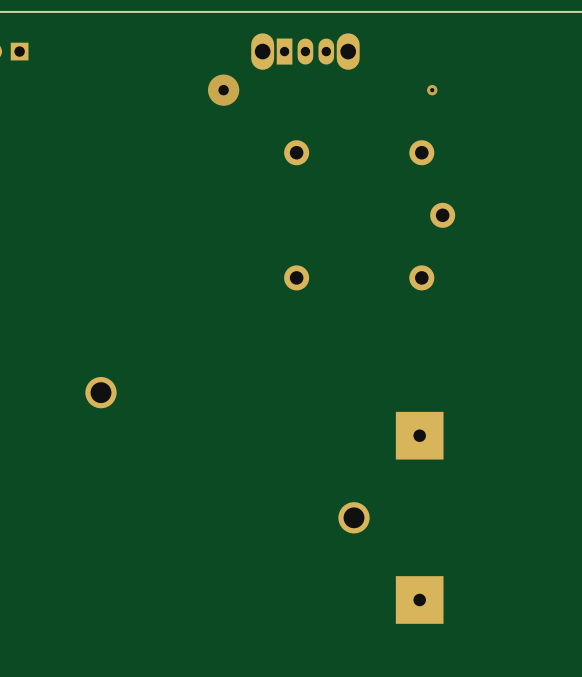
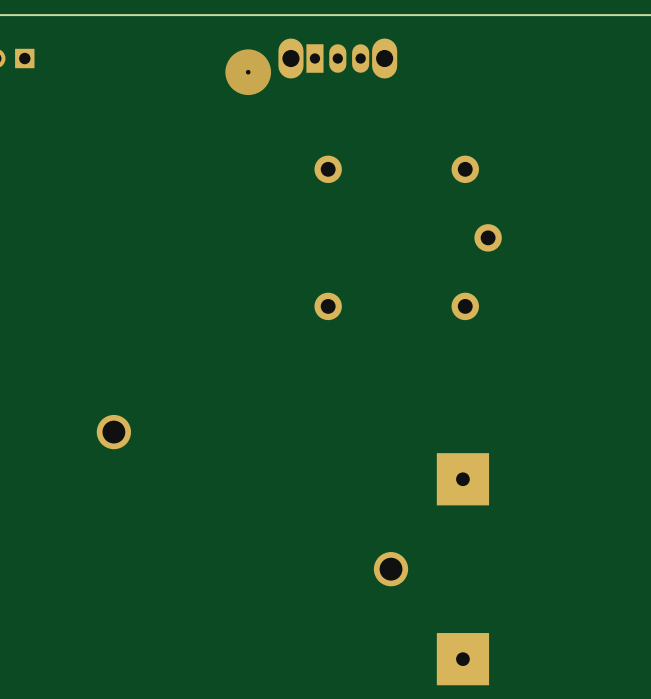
via: none -> (248, 72)
via: (223, 90) -> none
via: (432, 90) -> none

